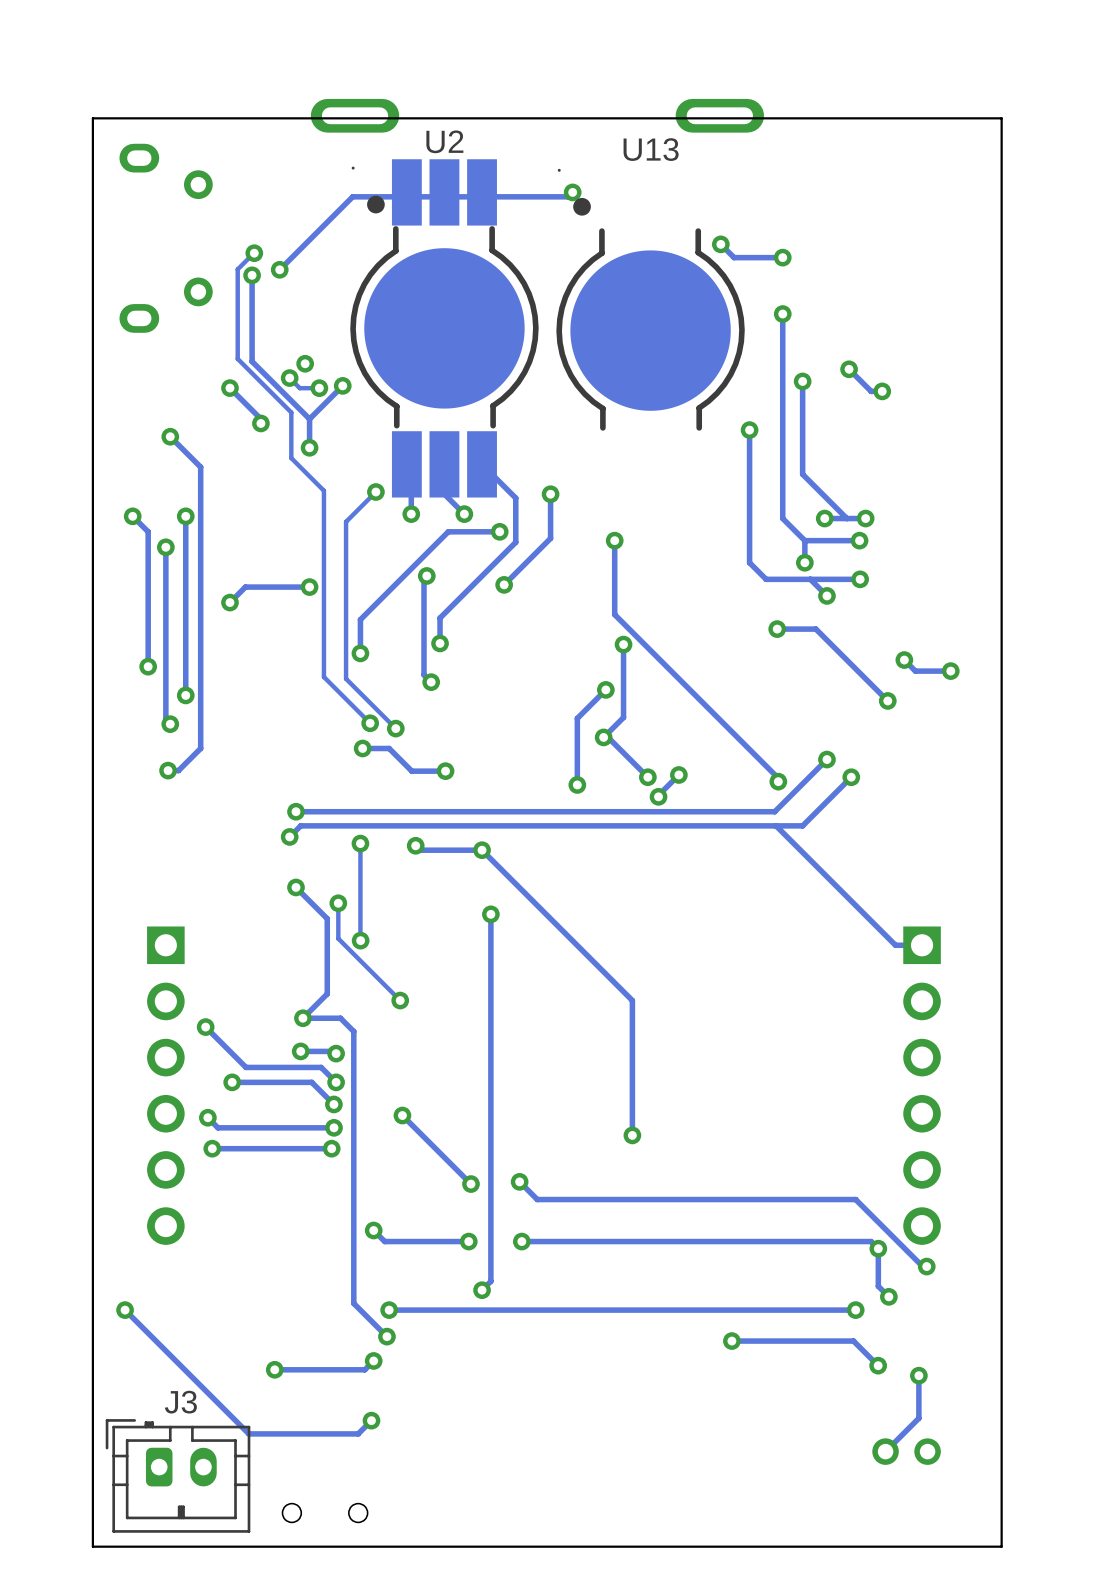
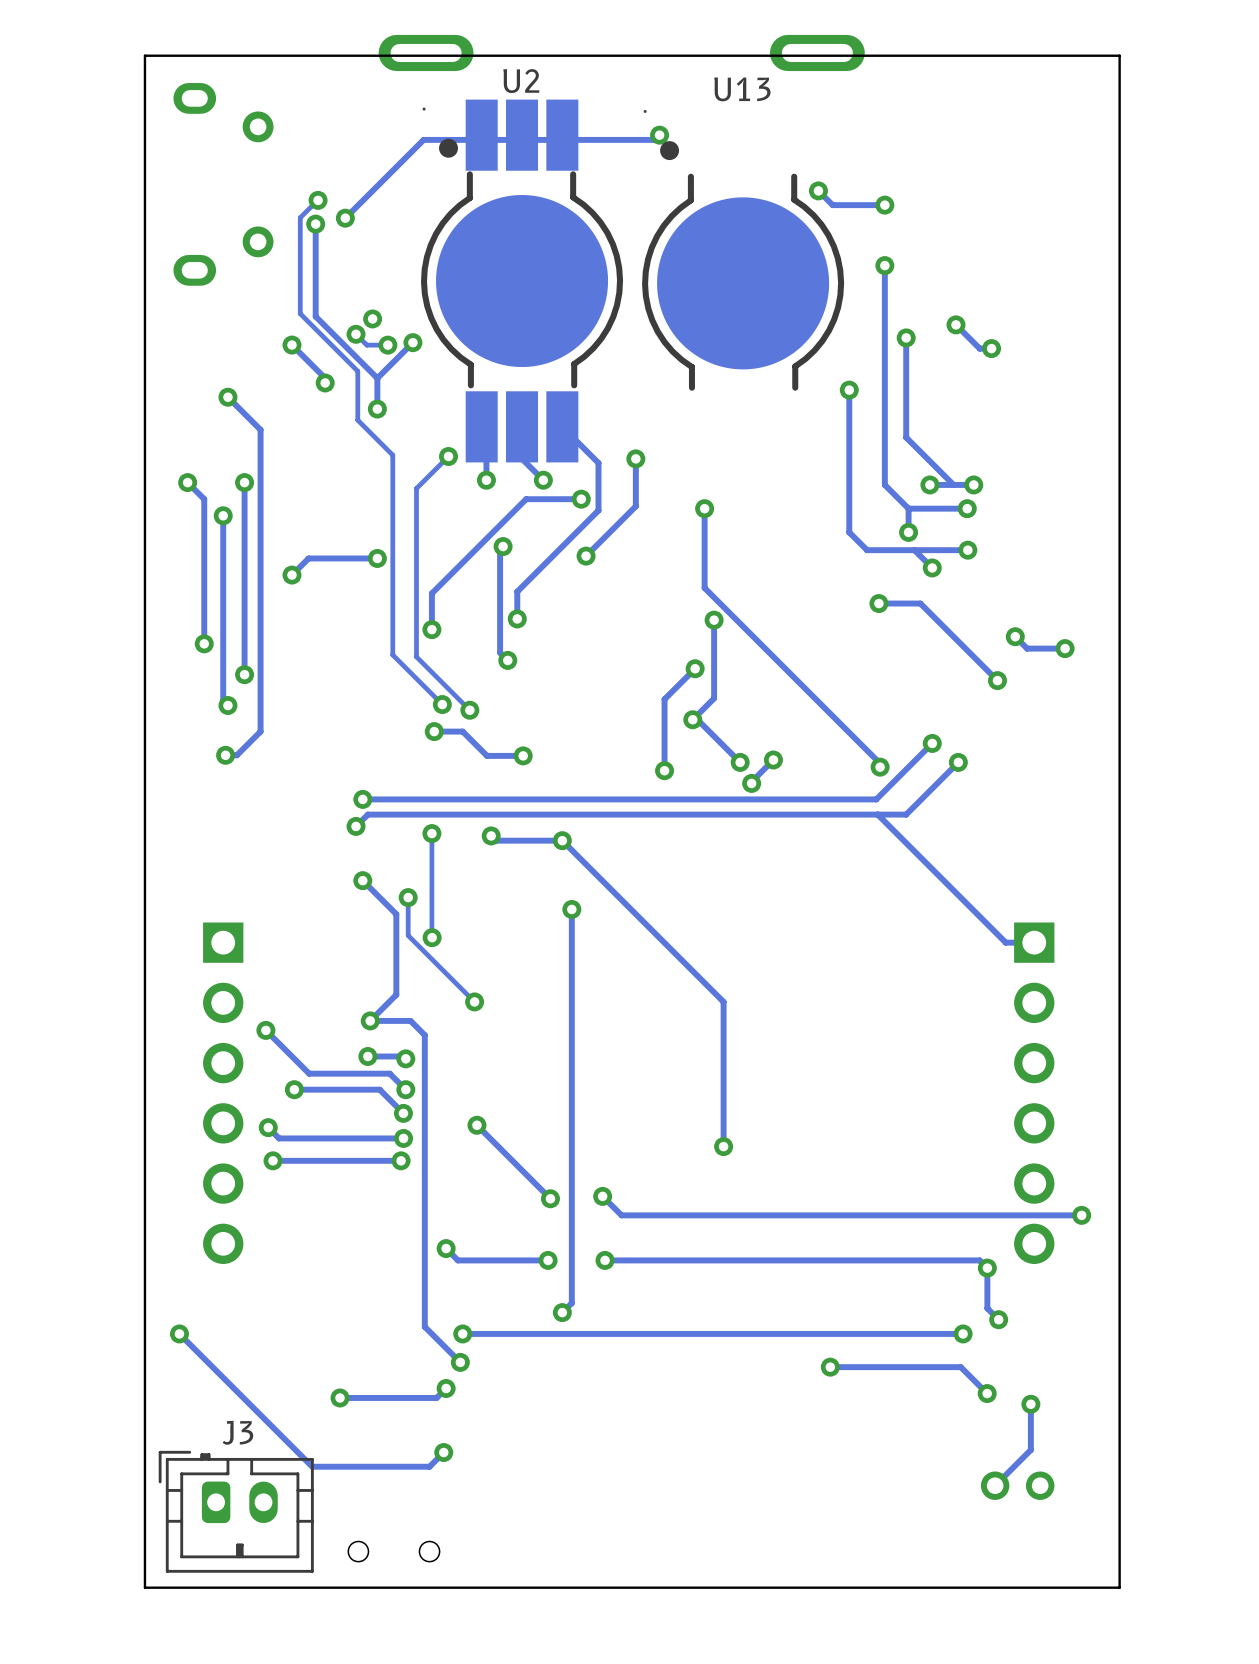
track: (855, 1199) (922, 1266) (926, 1266) -> (963, 1215) (1081, 1215)
via position: (926, 1266) -> (1081, 1215)

